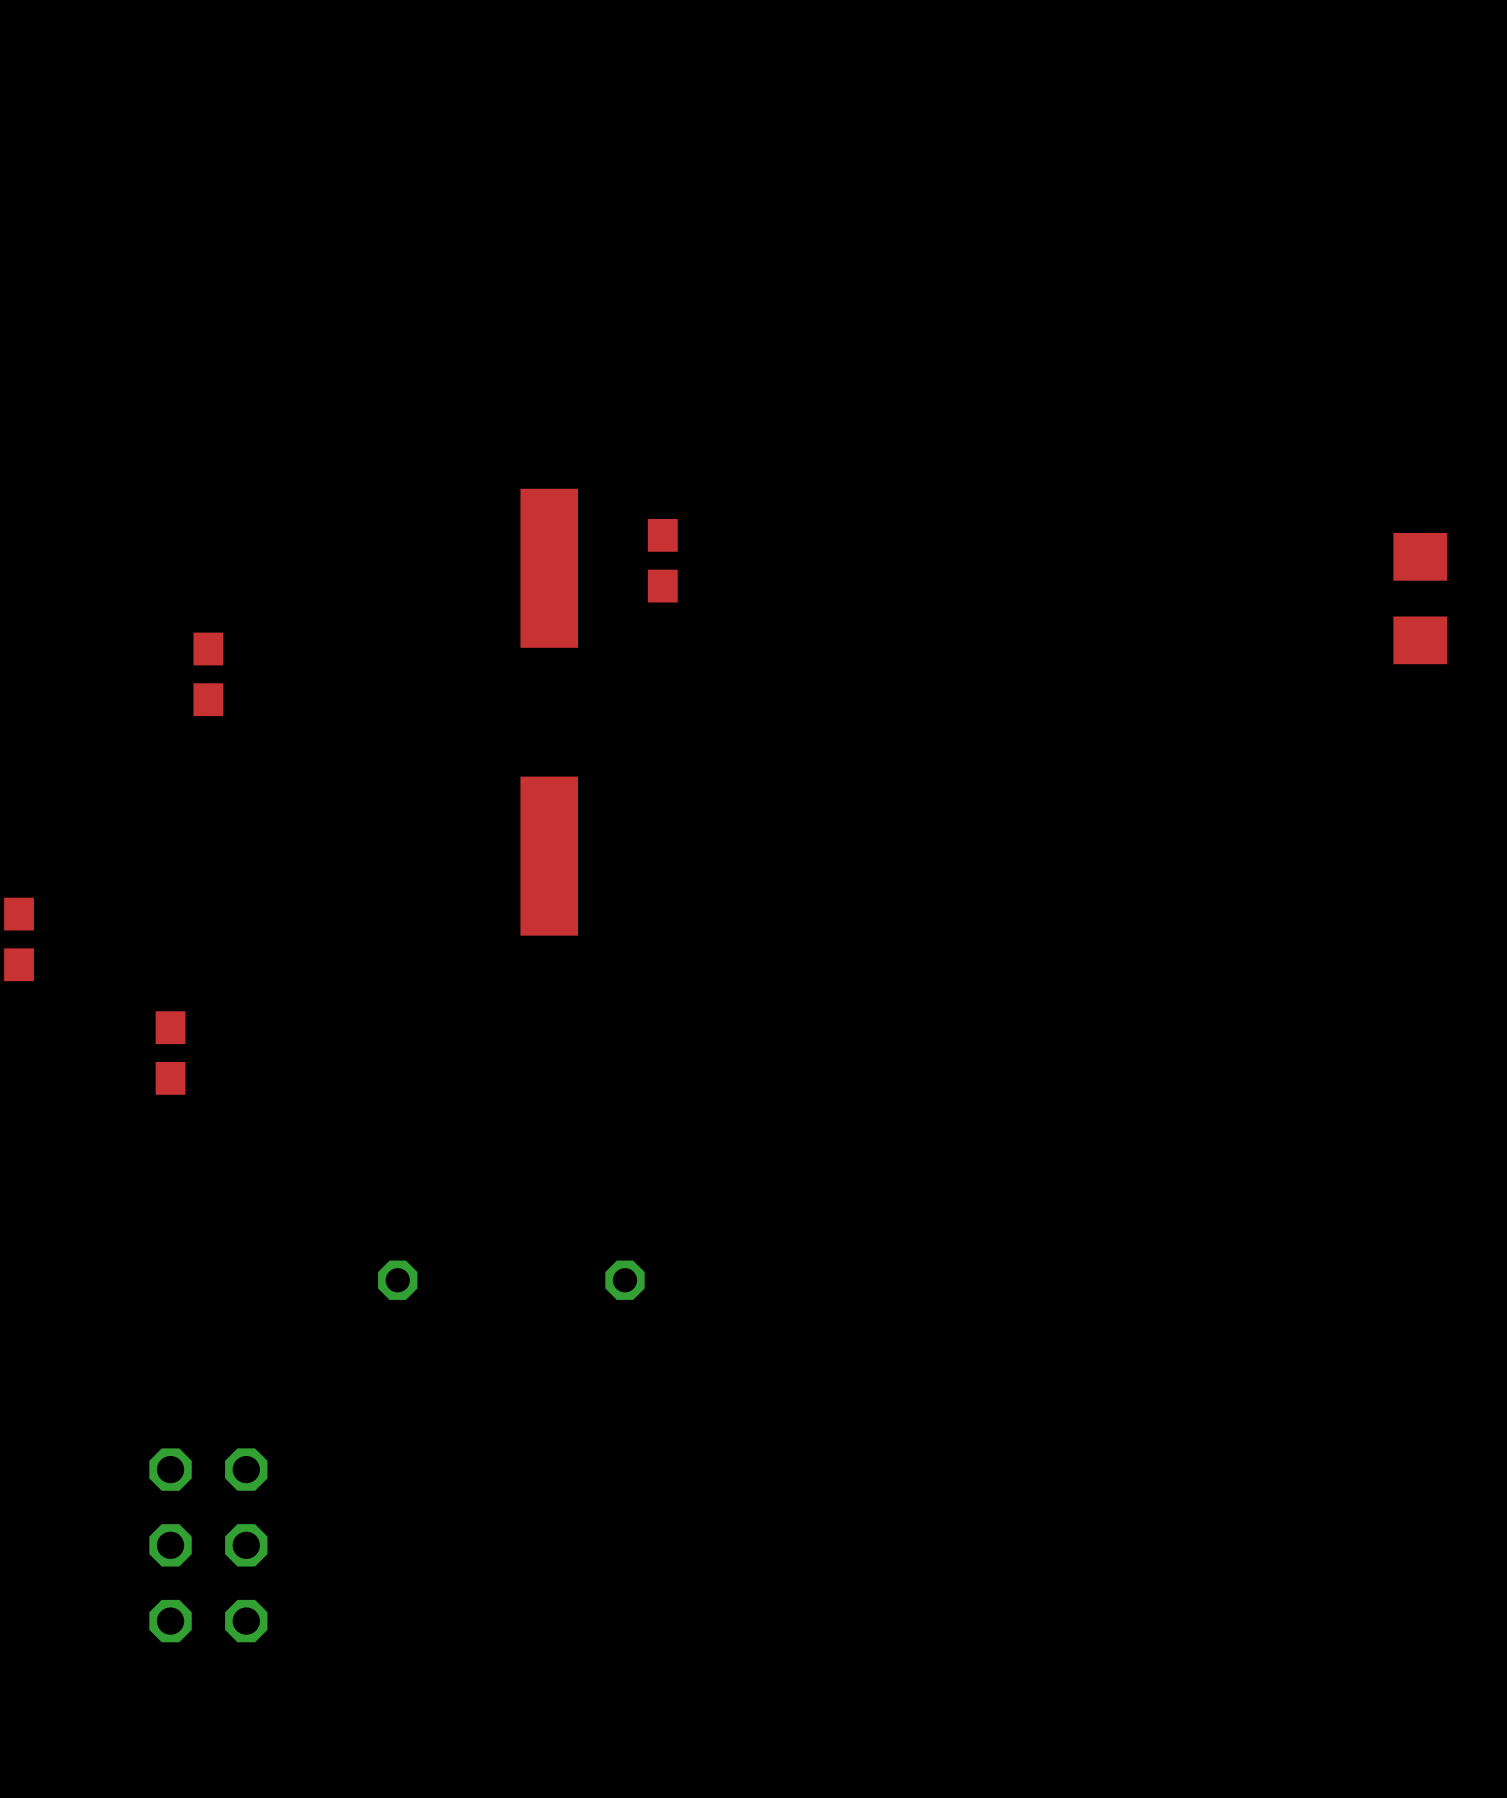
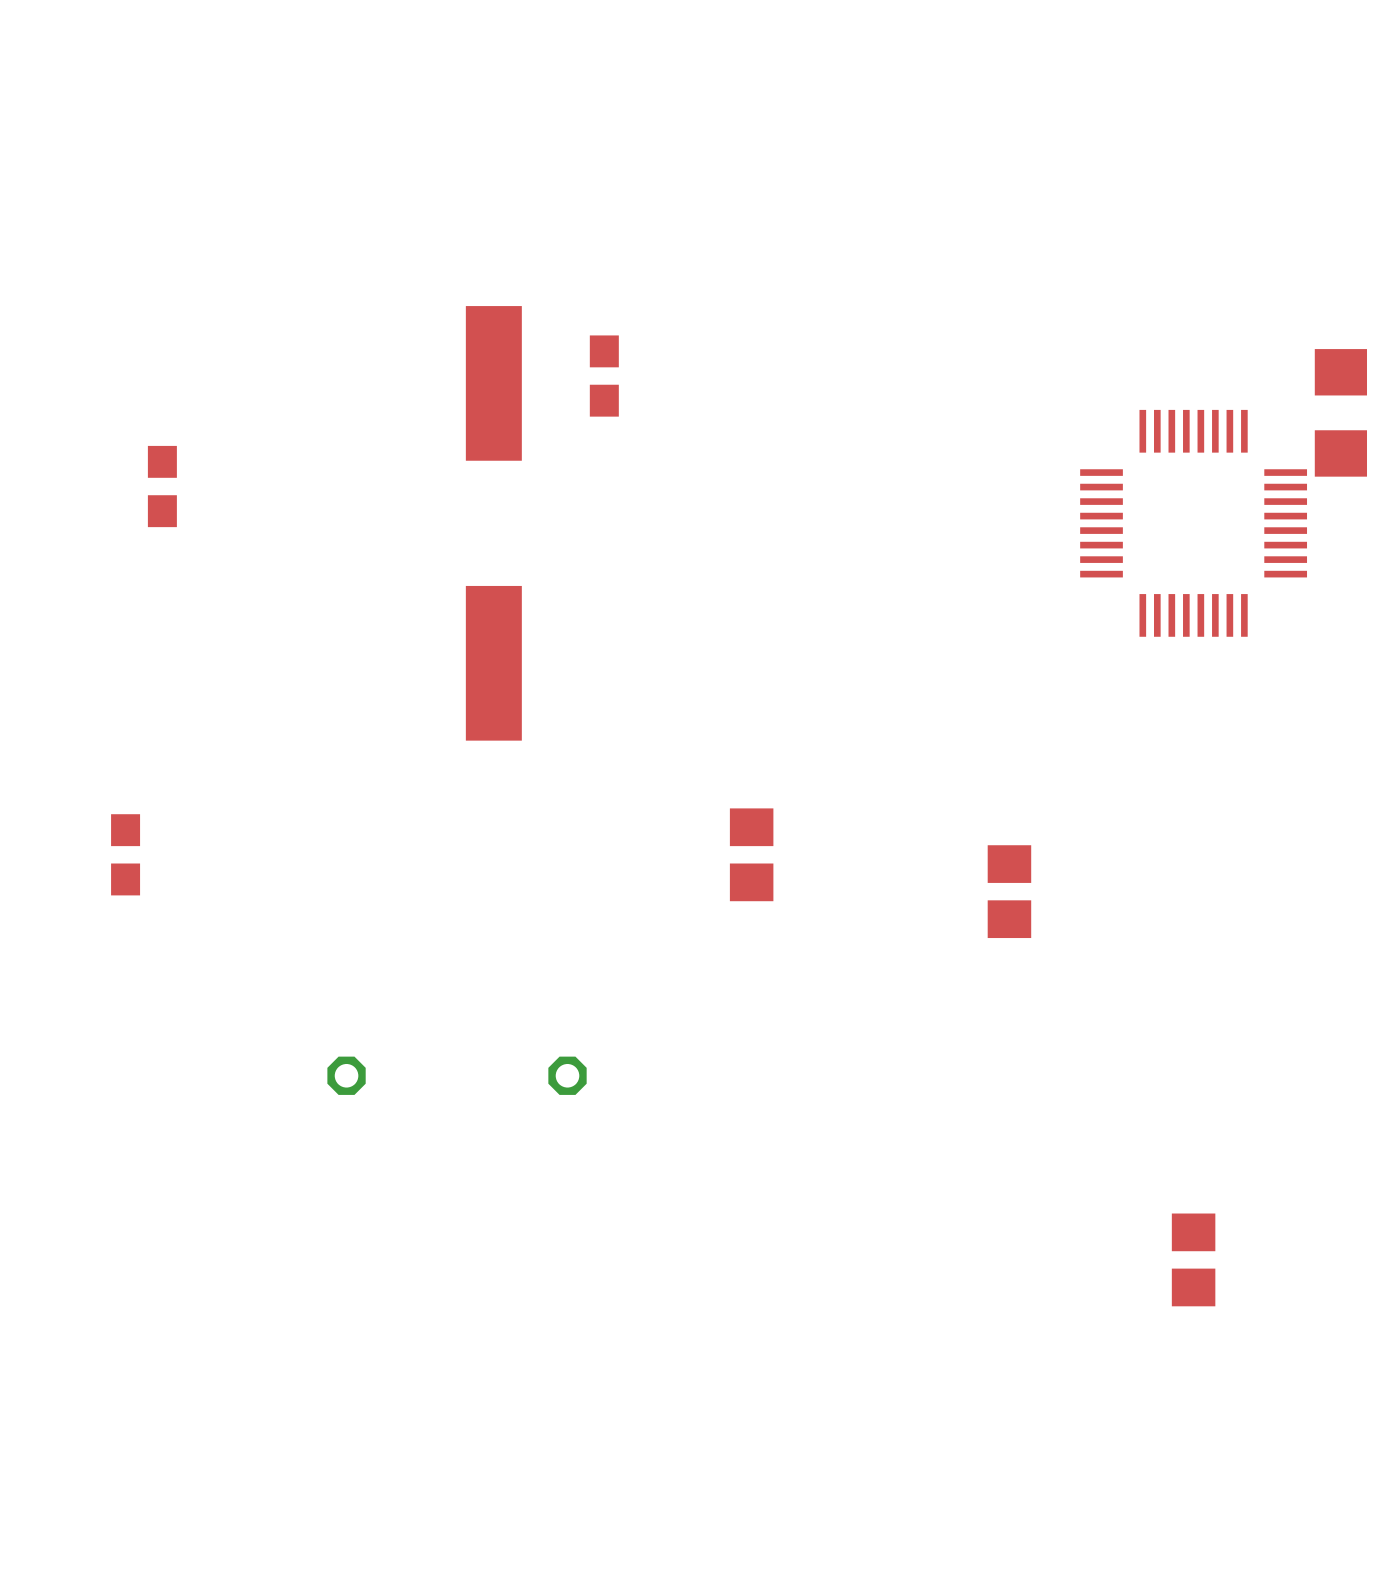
part: none -> (1193, 523)
part: none -> (751, 854)
part: none -> (1009, 891)
part: none -> (1193, 1259)
part: (208, 1545) -> none

